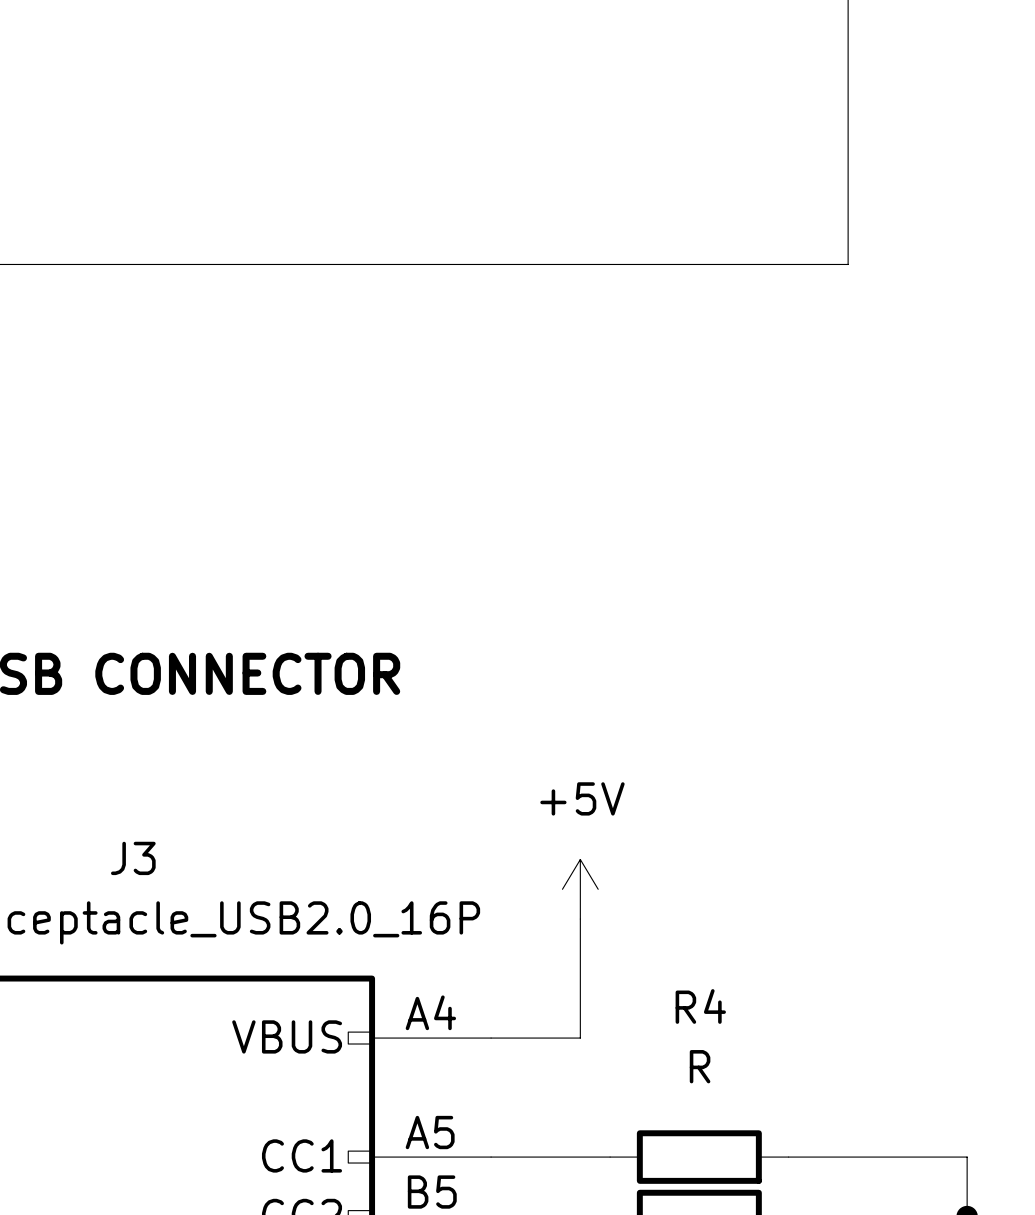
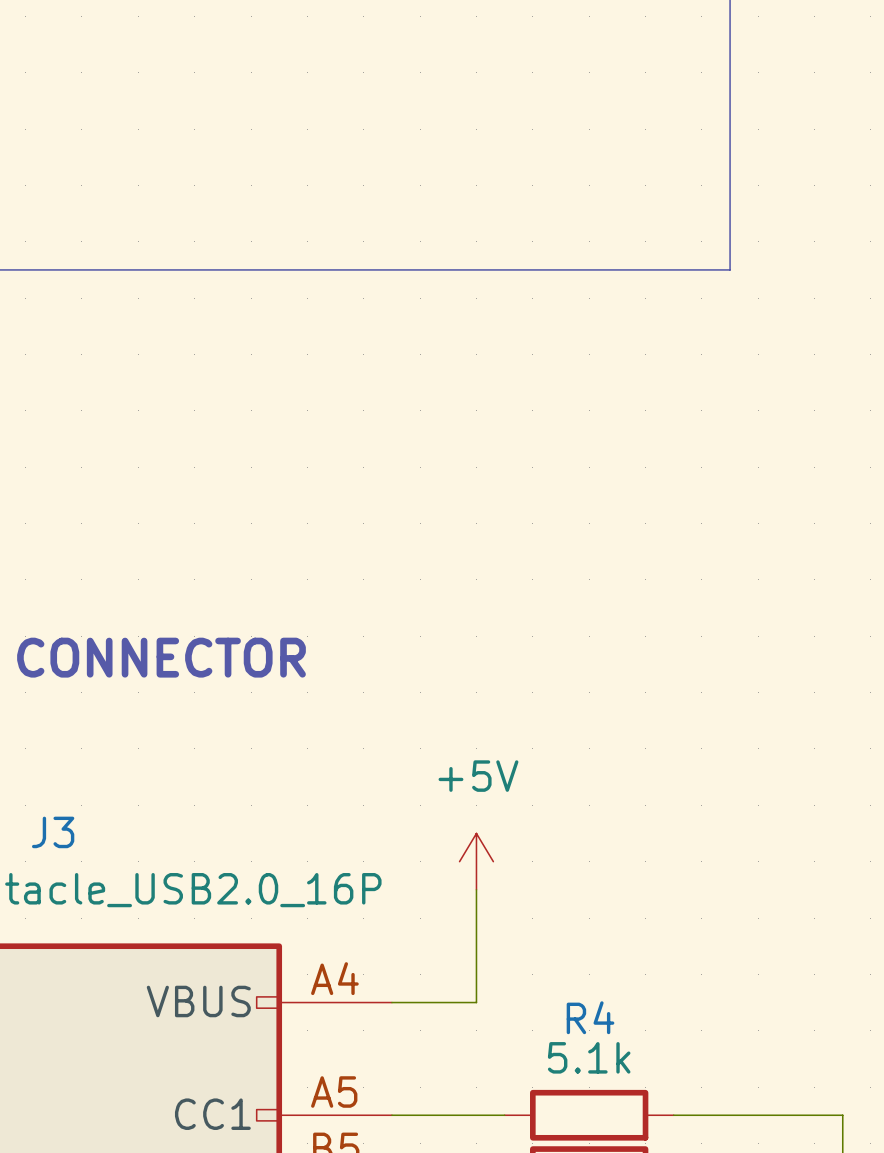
R4 name position: R4 (700, 1006) -> R4 (590, 1017)
R4 value: R (700, 1066) -> 5.1k (589, 1057)

